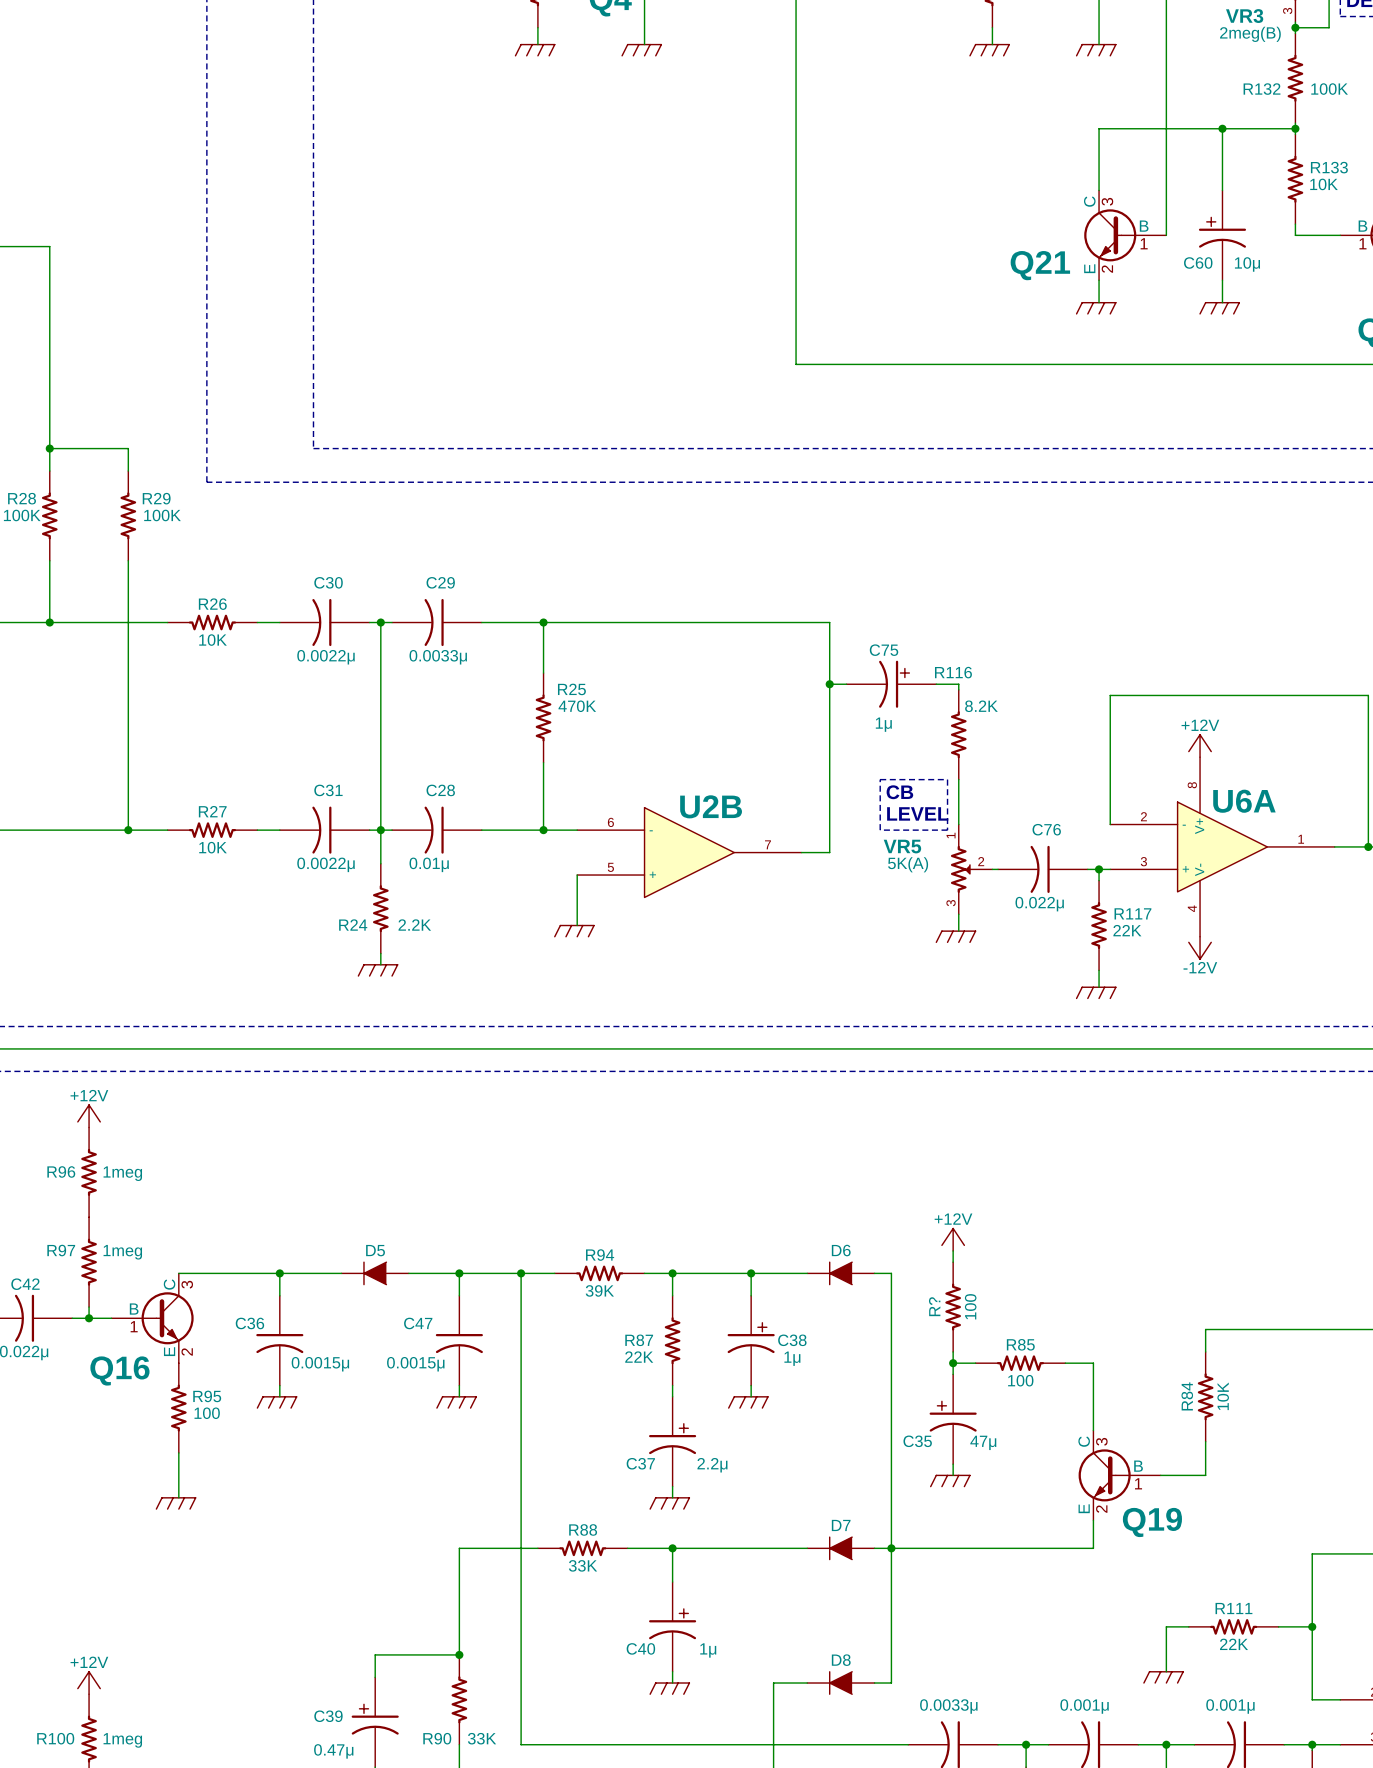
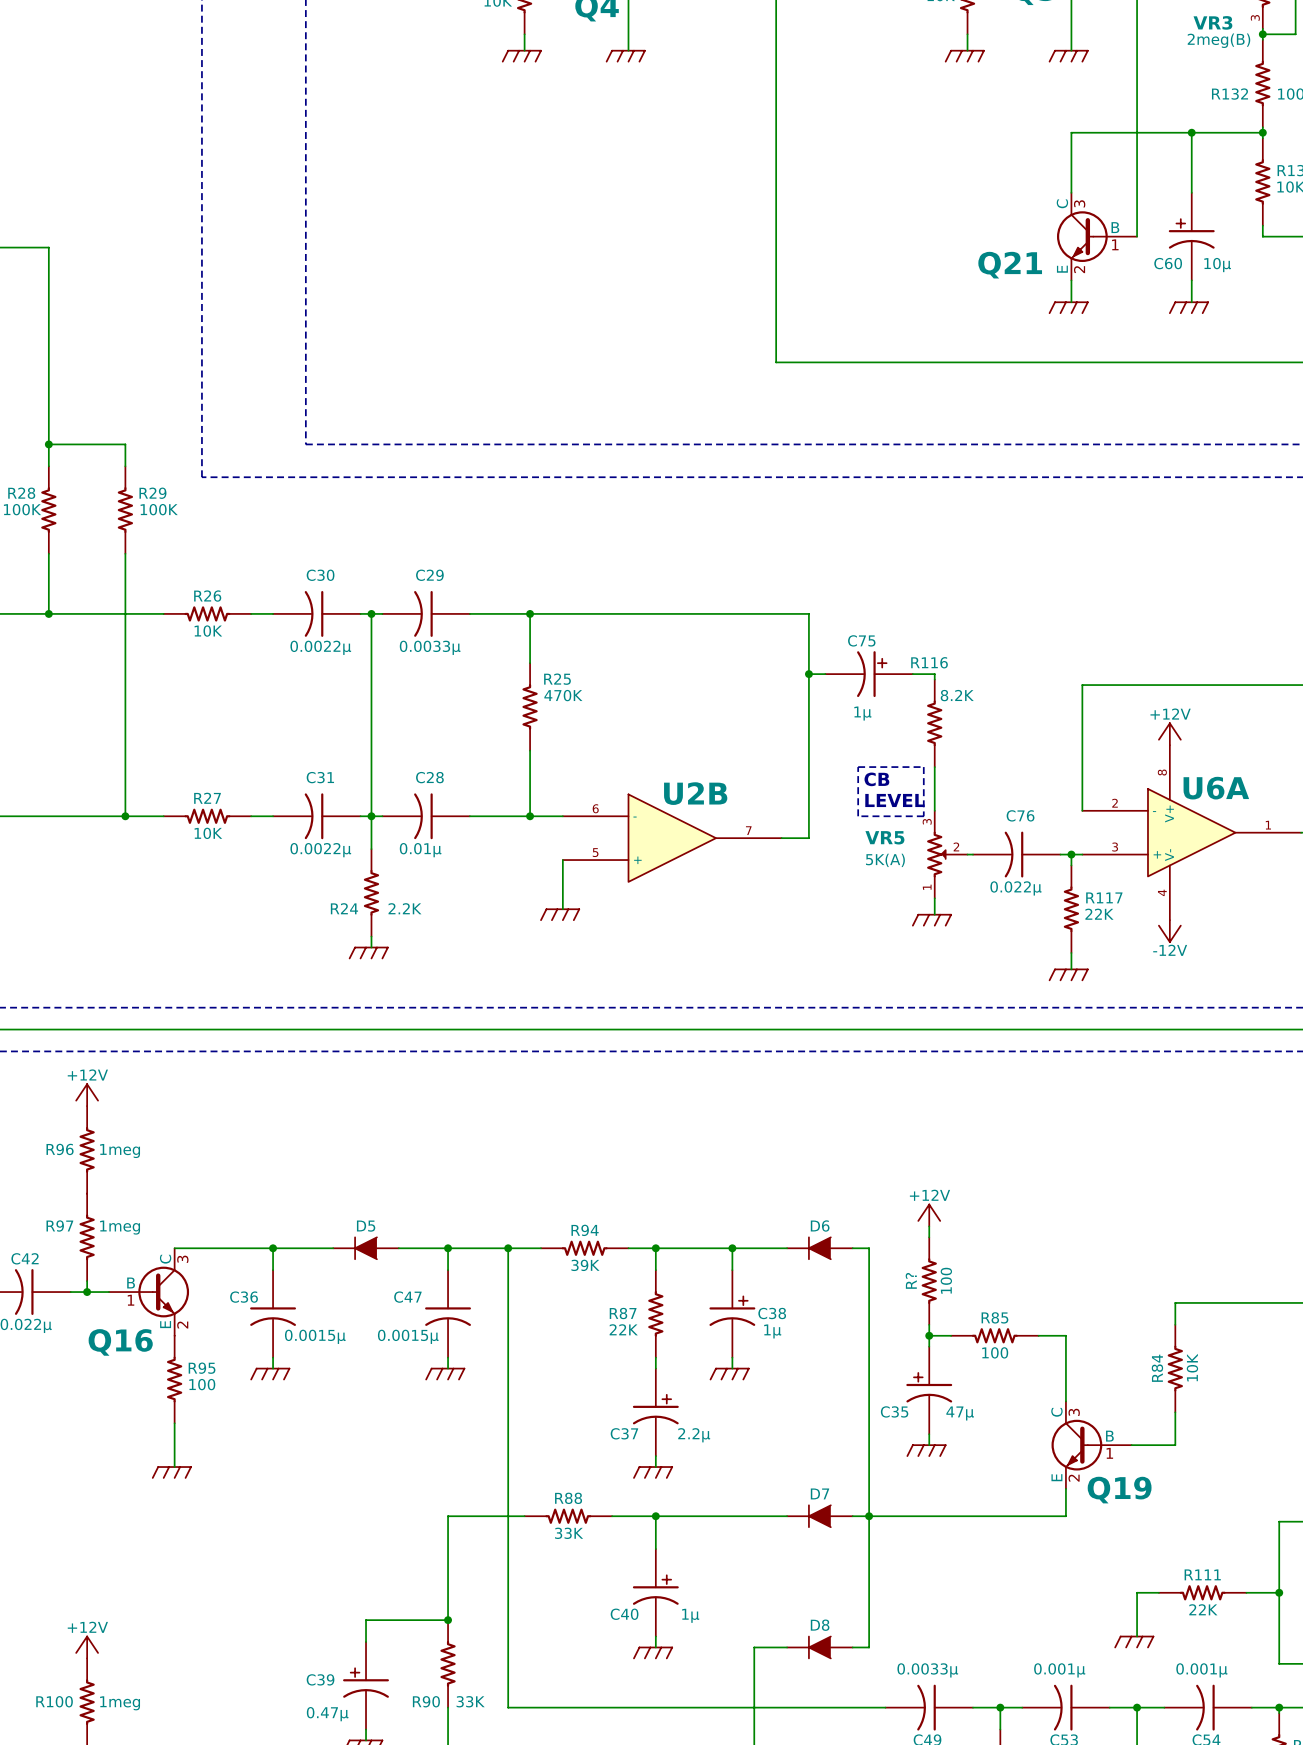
VR5 flip: as is (960, 869) -> up-down (936, 854)

